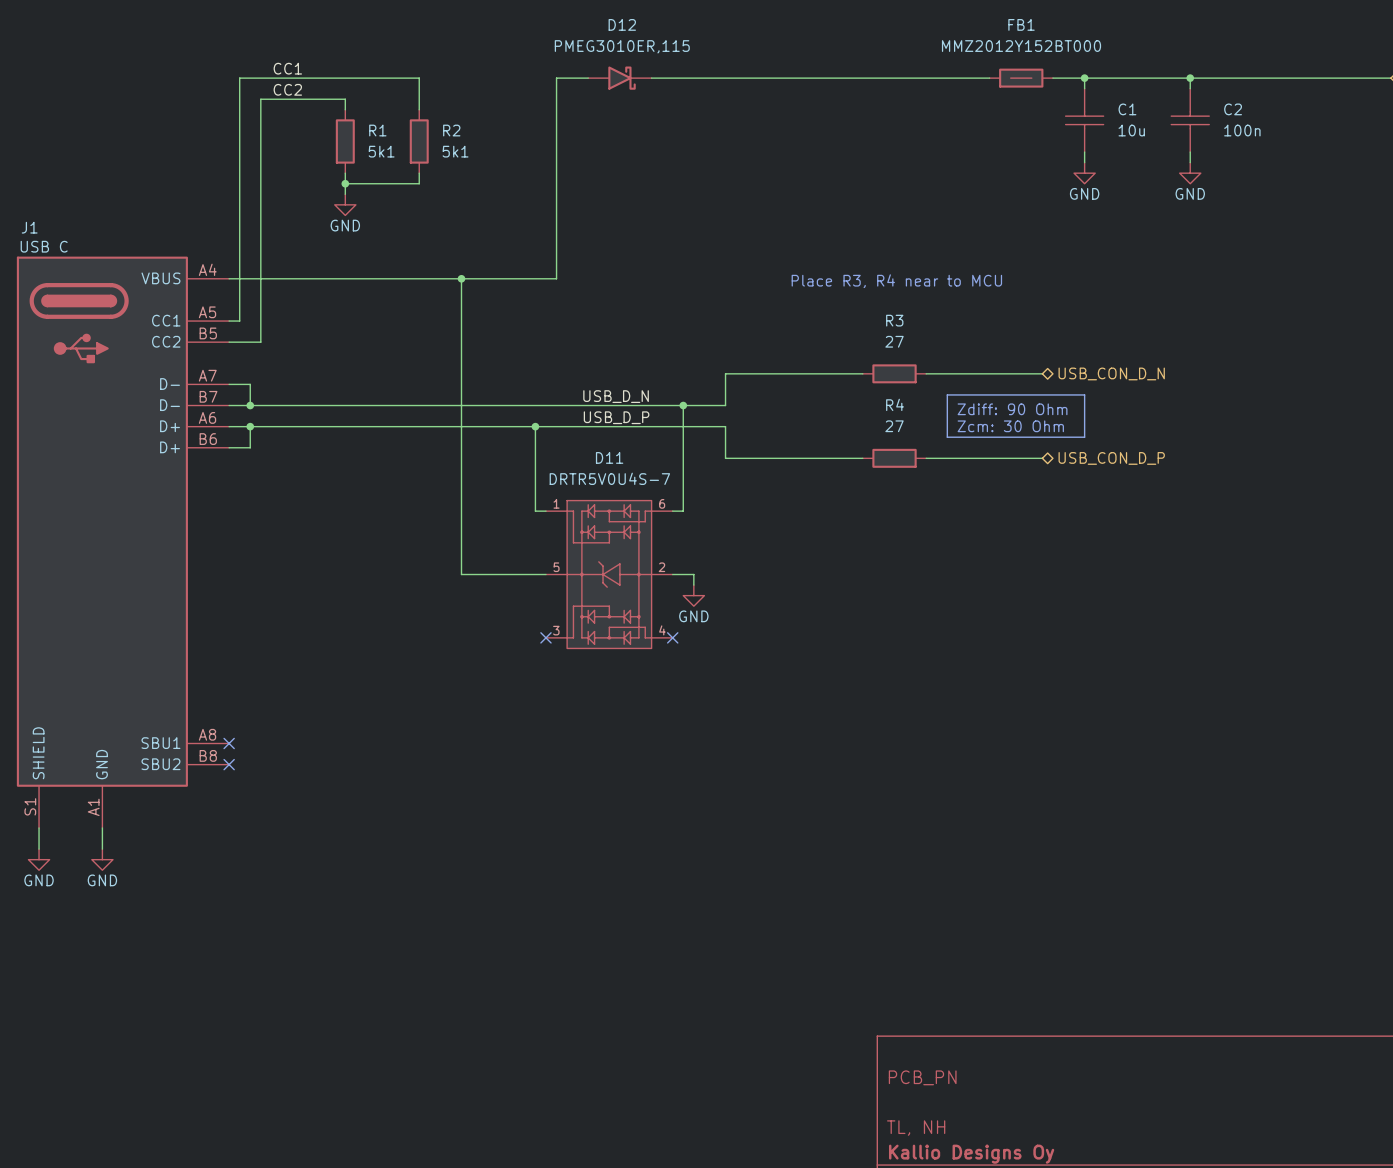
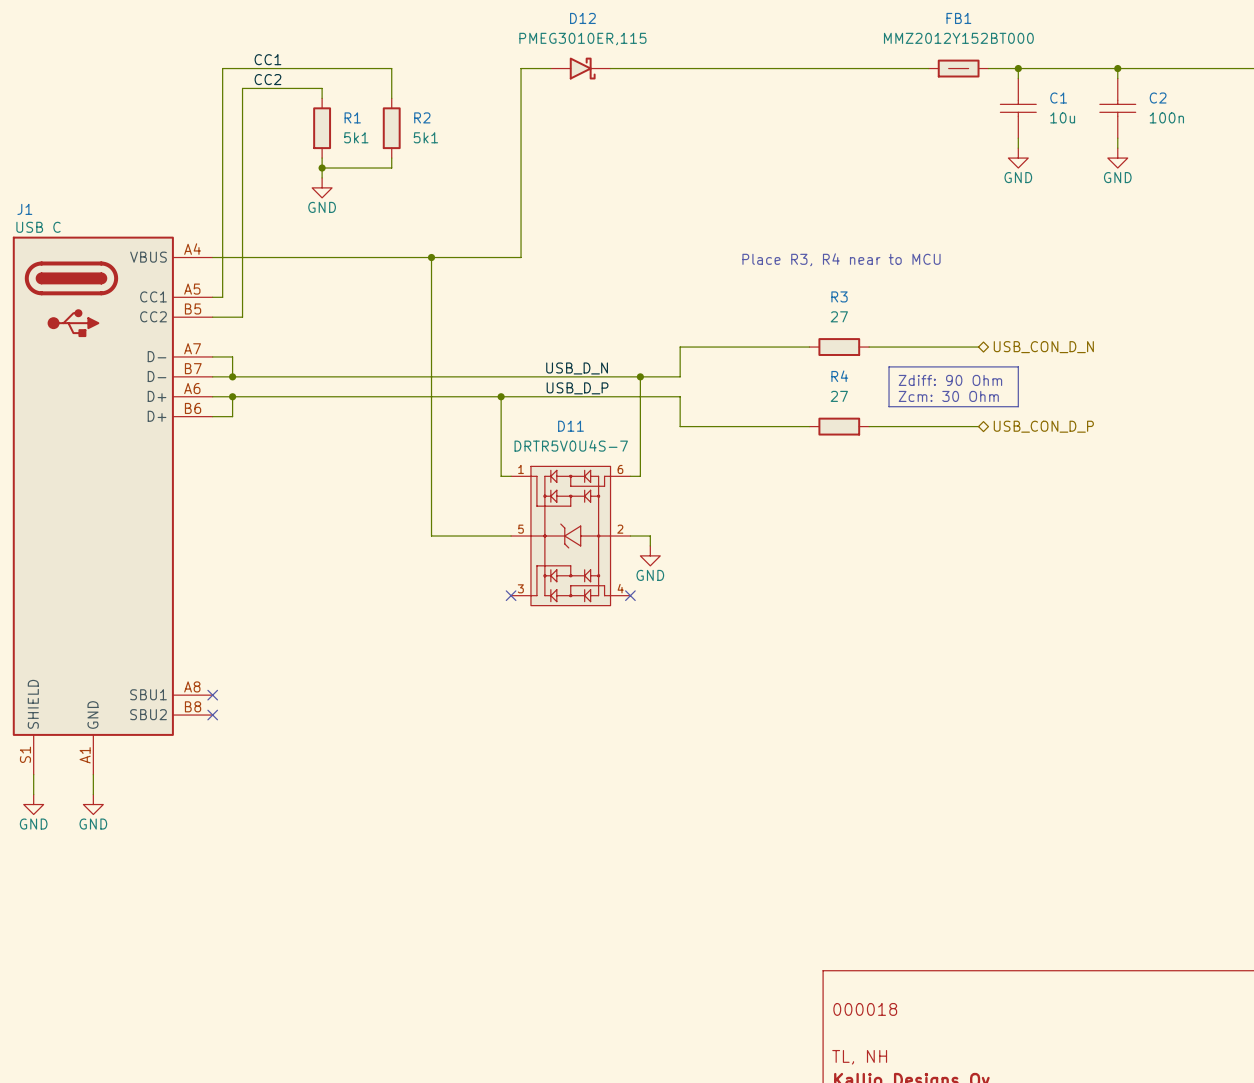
title block: PCB_PN (922, 1077) -> 000018 (865, 1009)

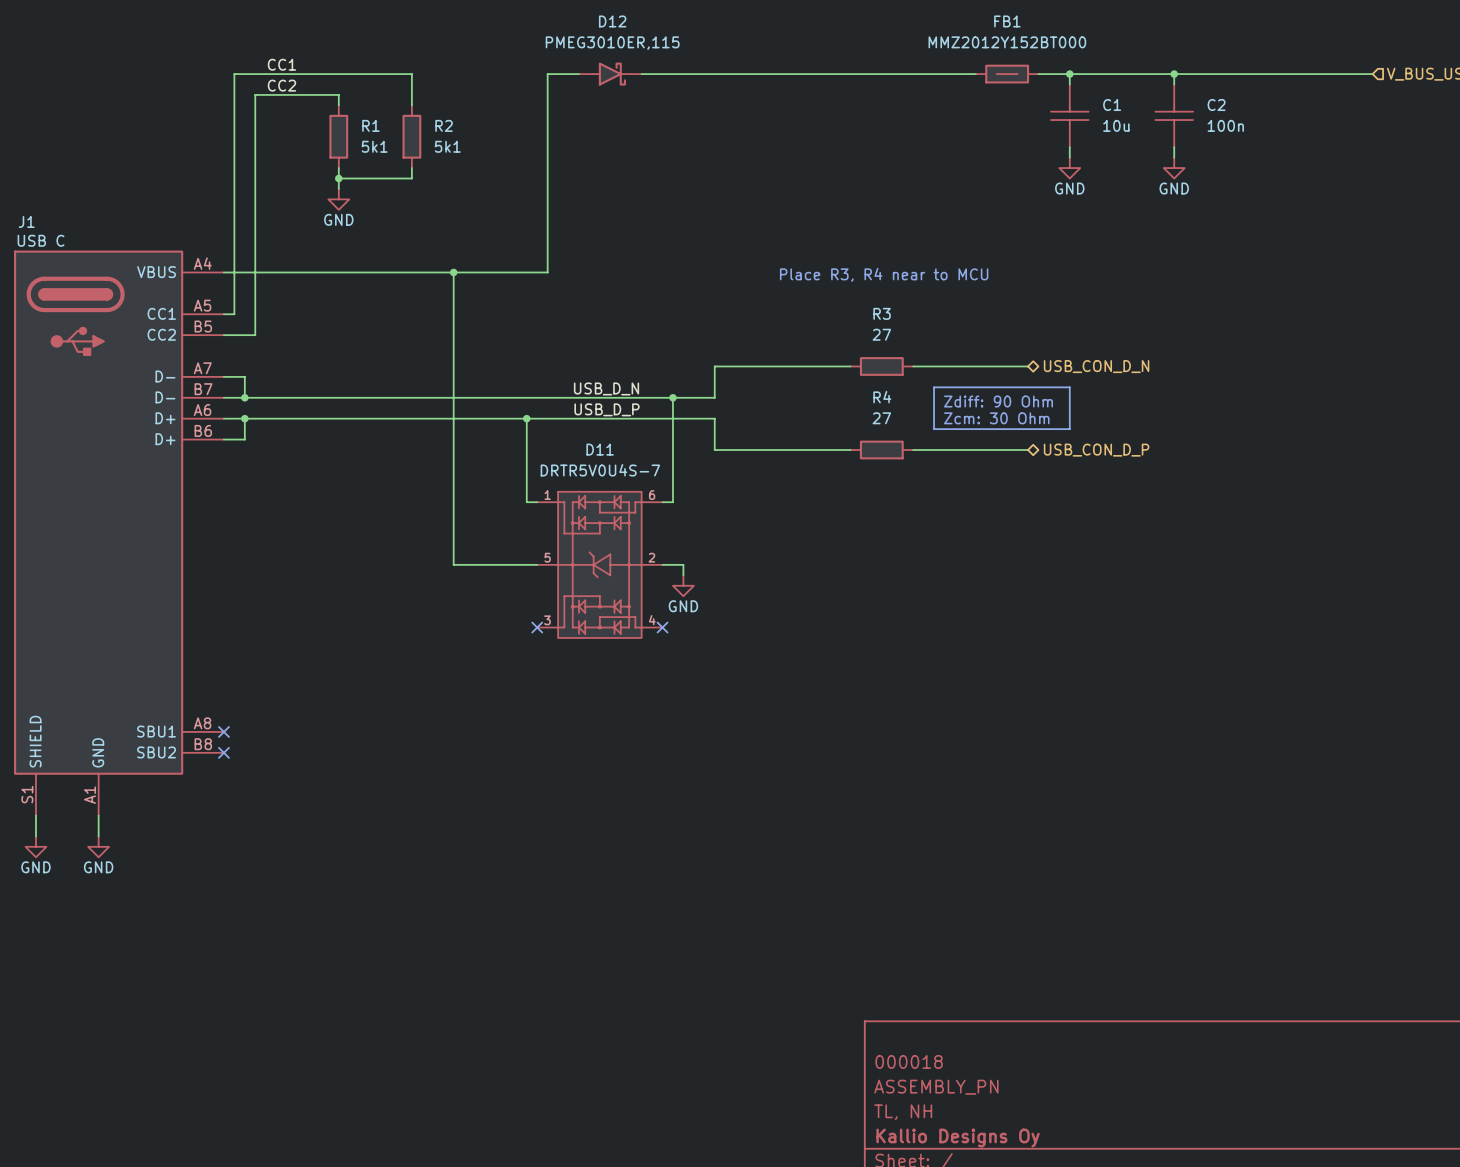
title block: none -> ASSEMBLY_PN (936, 1087)

